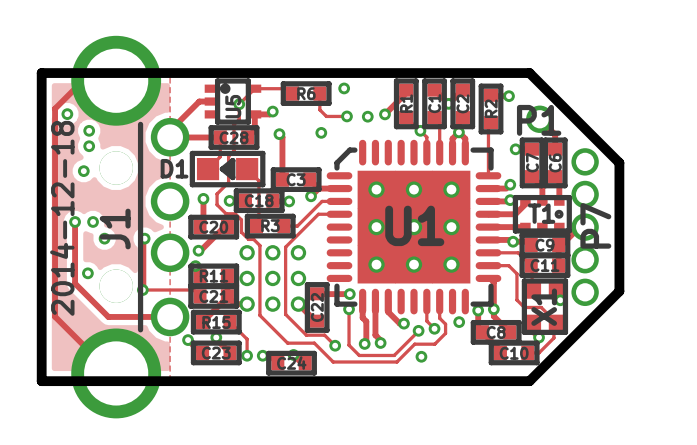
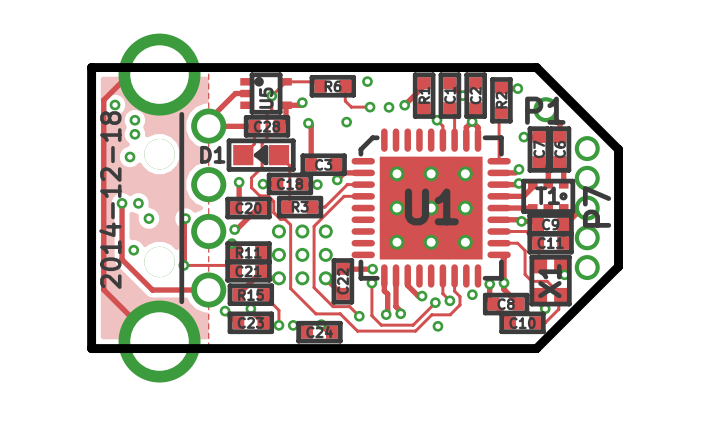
J1 name: J1 (115, 229) -> none

